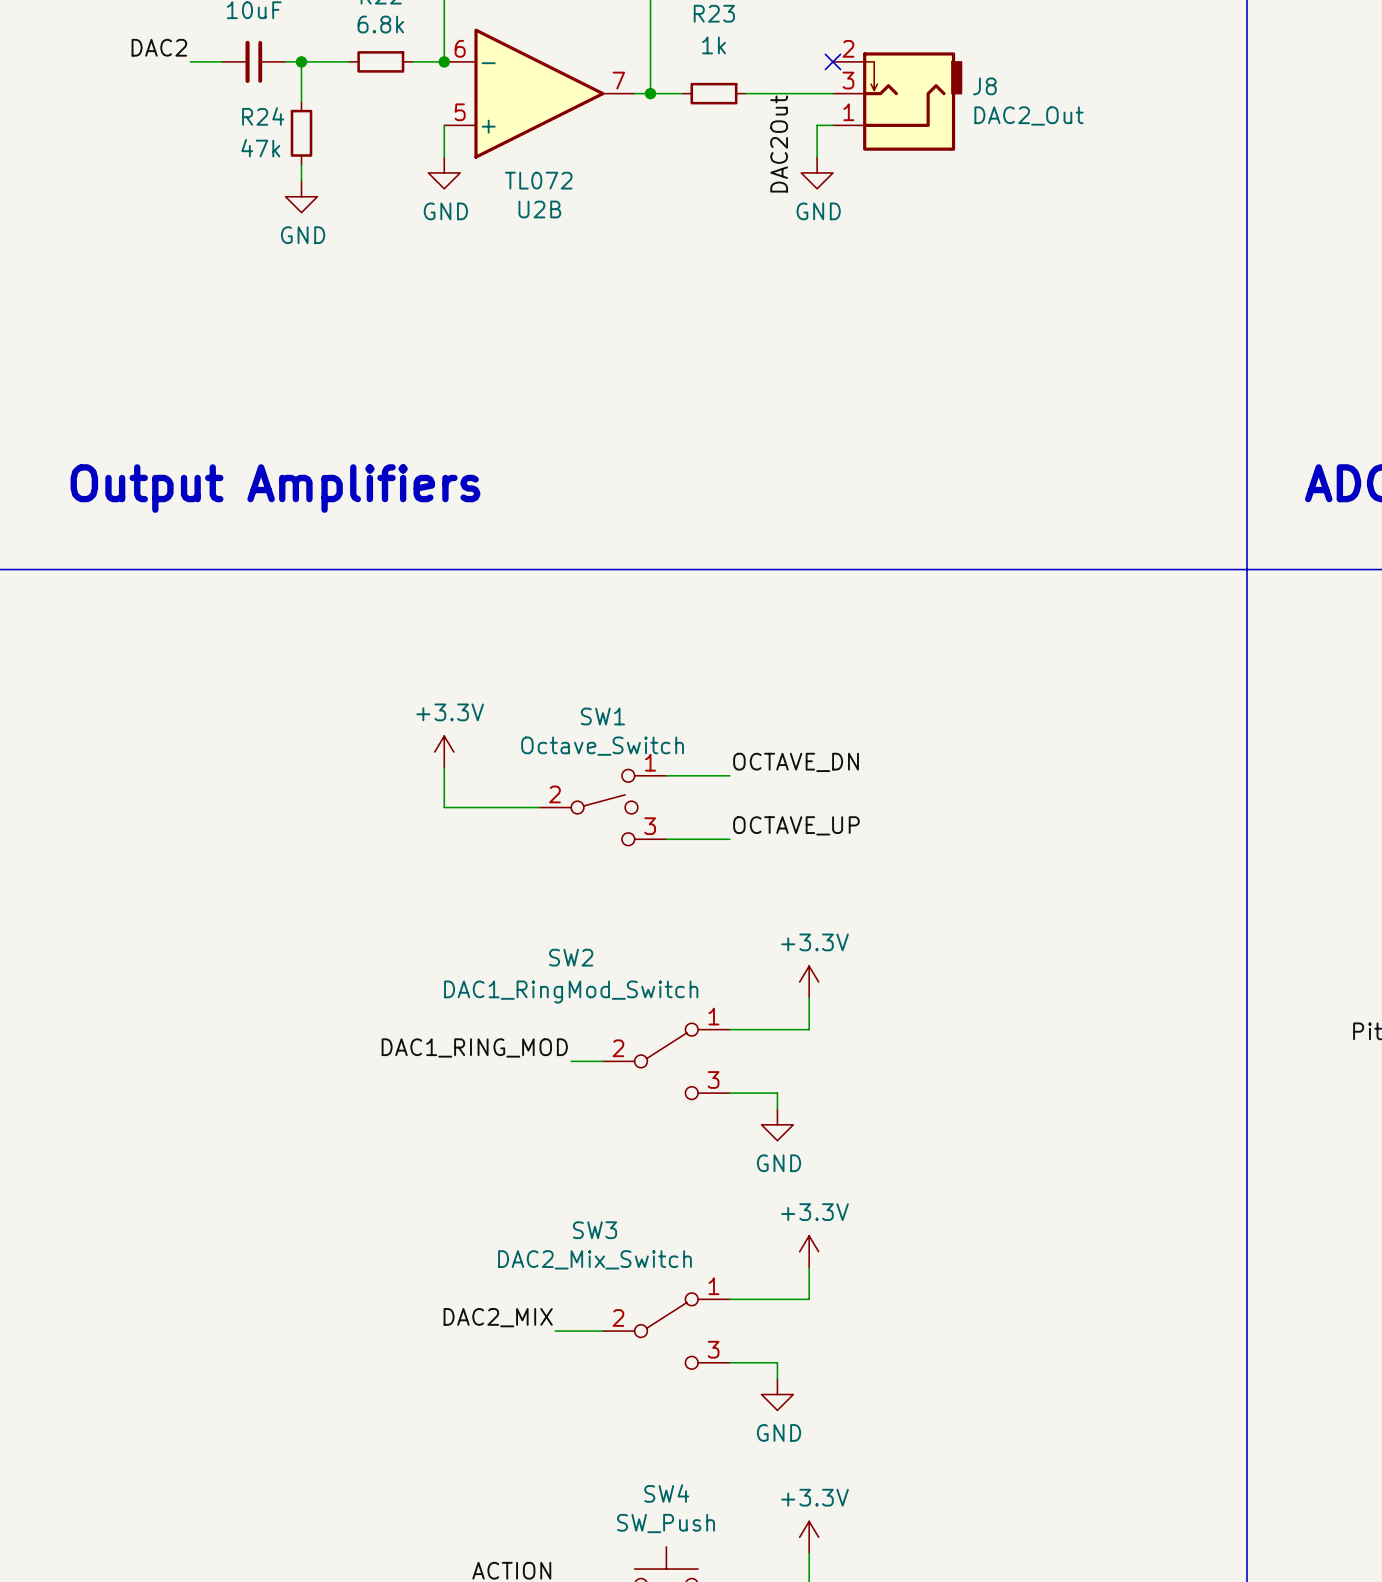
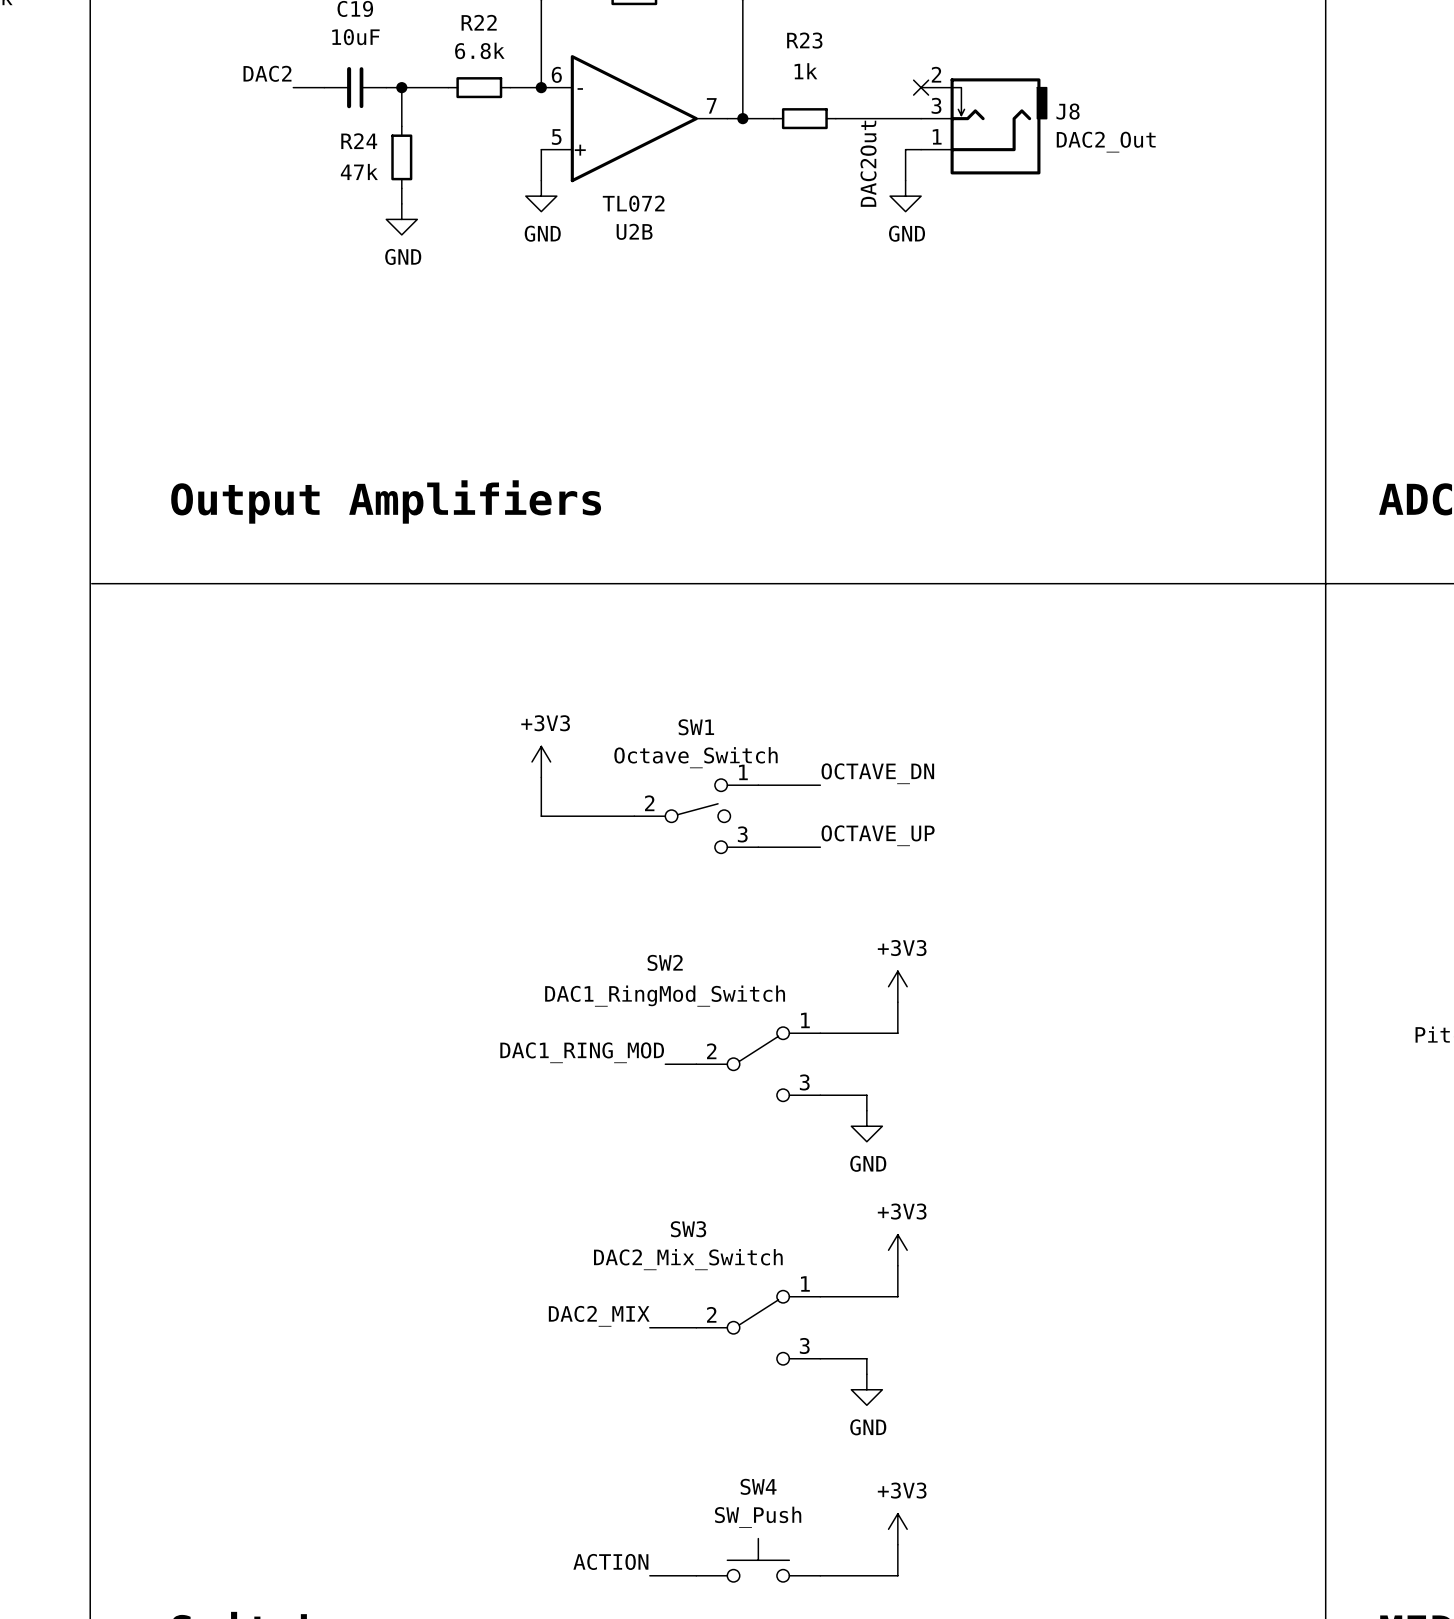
power symbol: +3.3V (444, 752) -> +3V3 (541, 761)
power symbol: +3.3V (809, 982) -> +3V3 (897, 986)
power symbol: +3.3V (809, 1251) -> +3V3 (897, 1250)
power symbol: +3.3V (809, 1537) -> +3V3 (897, 1529)

